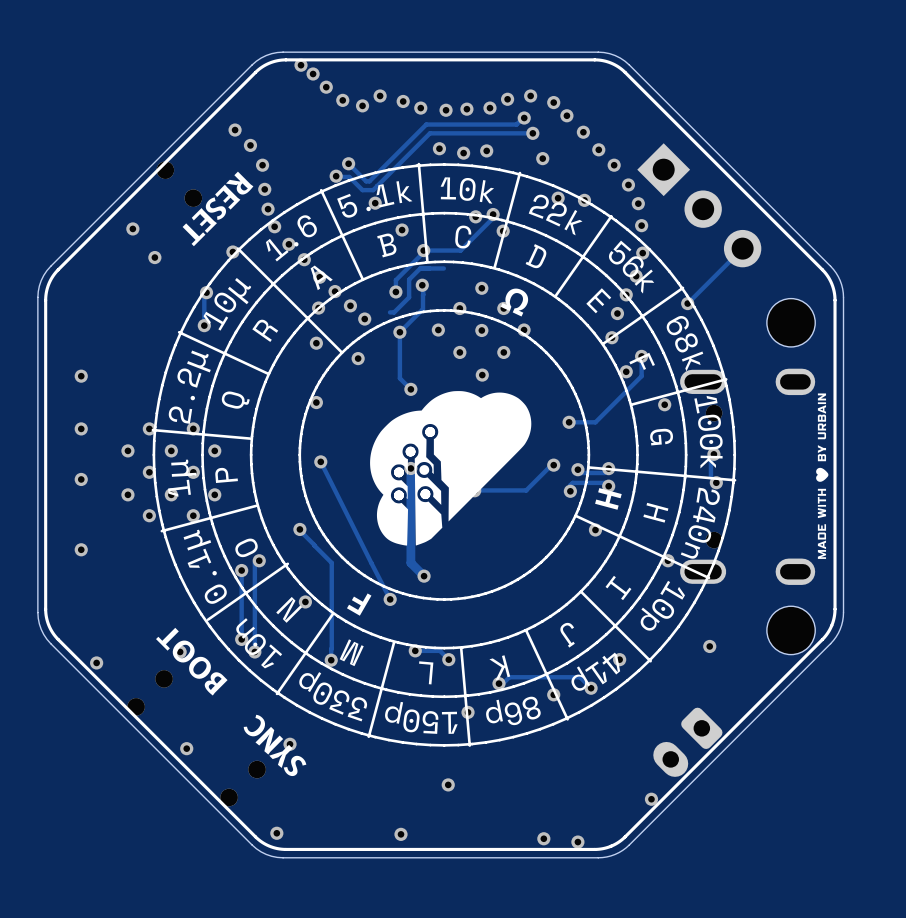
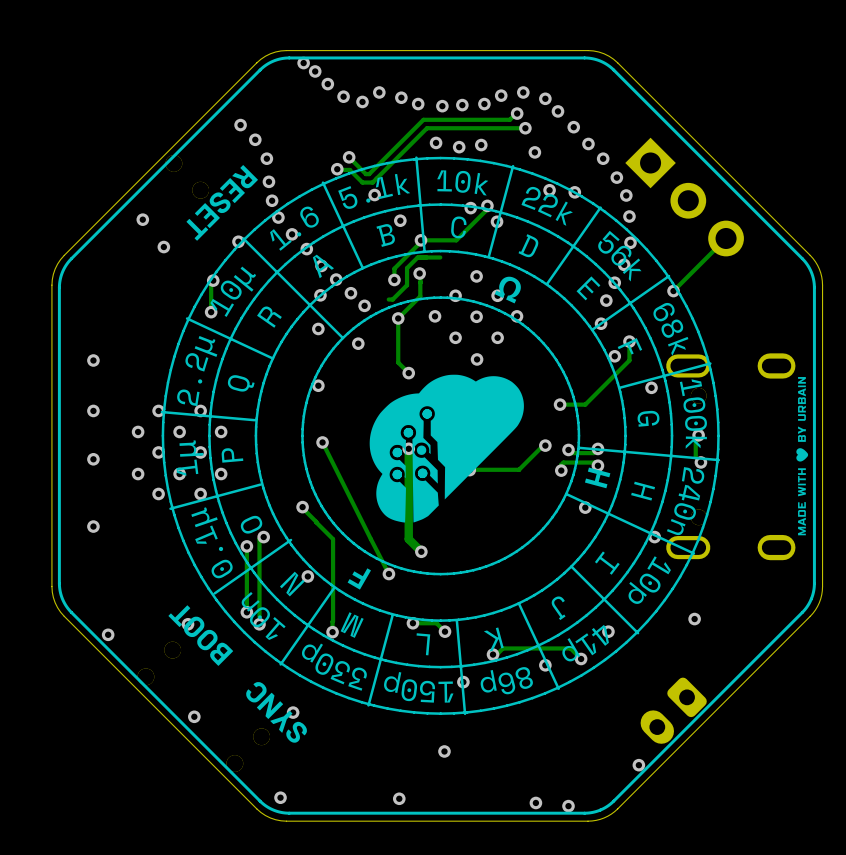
part: (791, 322) -> none
part: (791, 630) -> none

